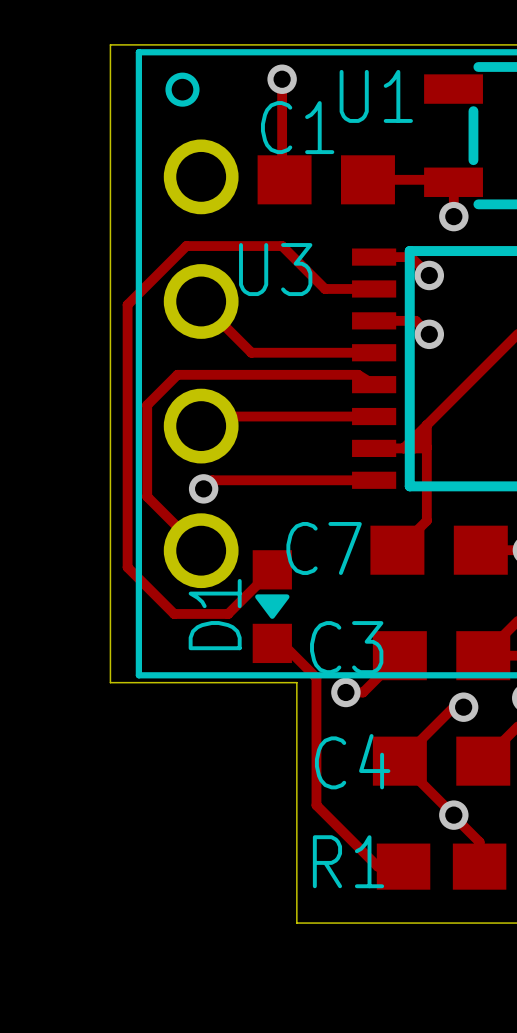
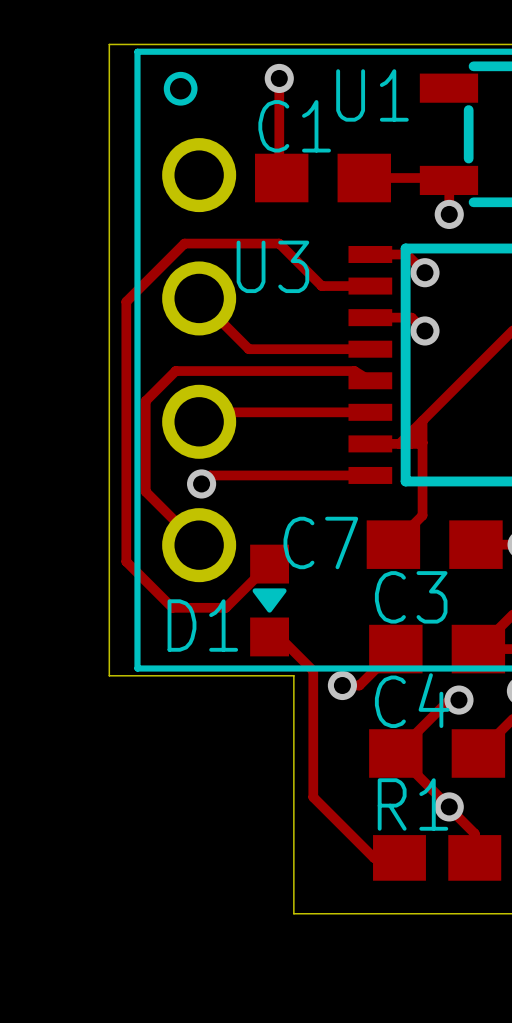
D1 name rotation: 0° (215, 614) -> 90° clockwise (202, 625)
C3 name position: C3 (346, 647) -> C3 (411, 597)
C4 name position: C4 (352, 761) -> C4 (412, 700)
R1 name position: R1 (348, 861) -> R1 (412, 804)

